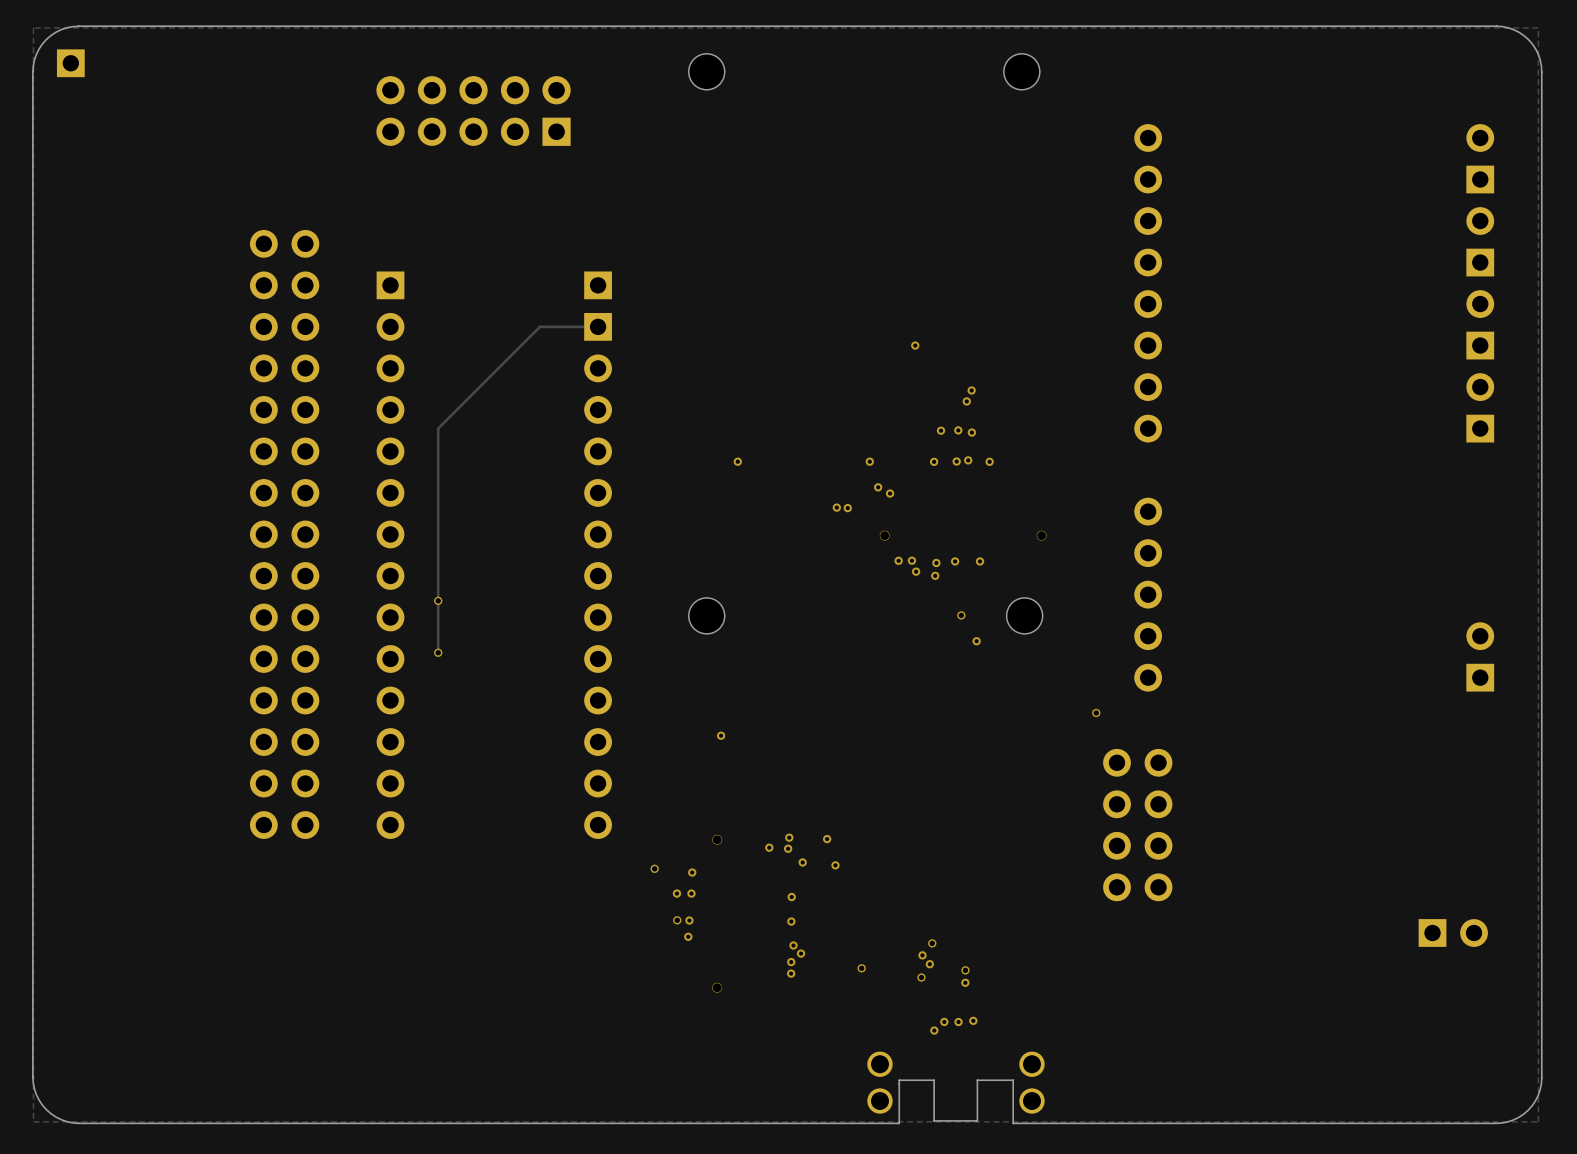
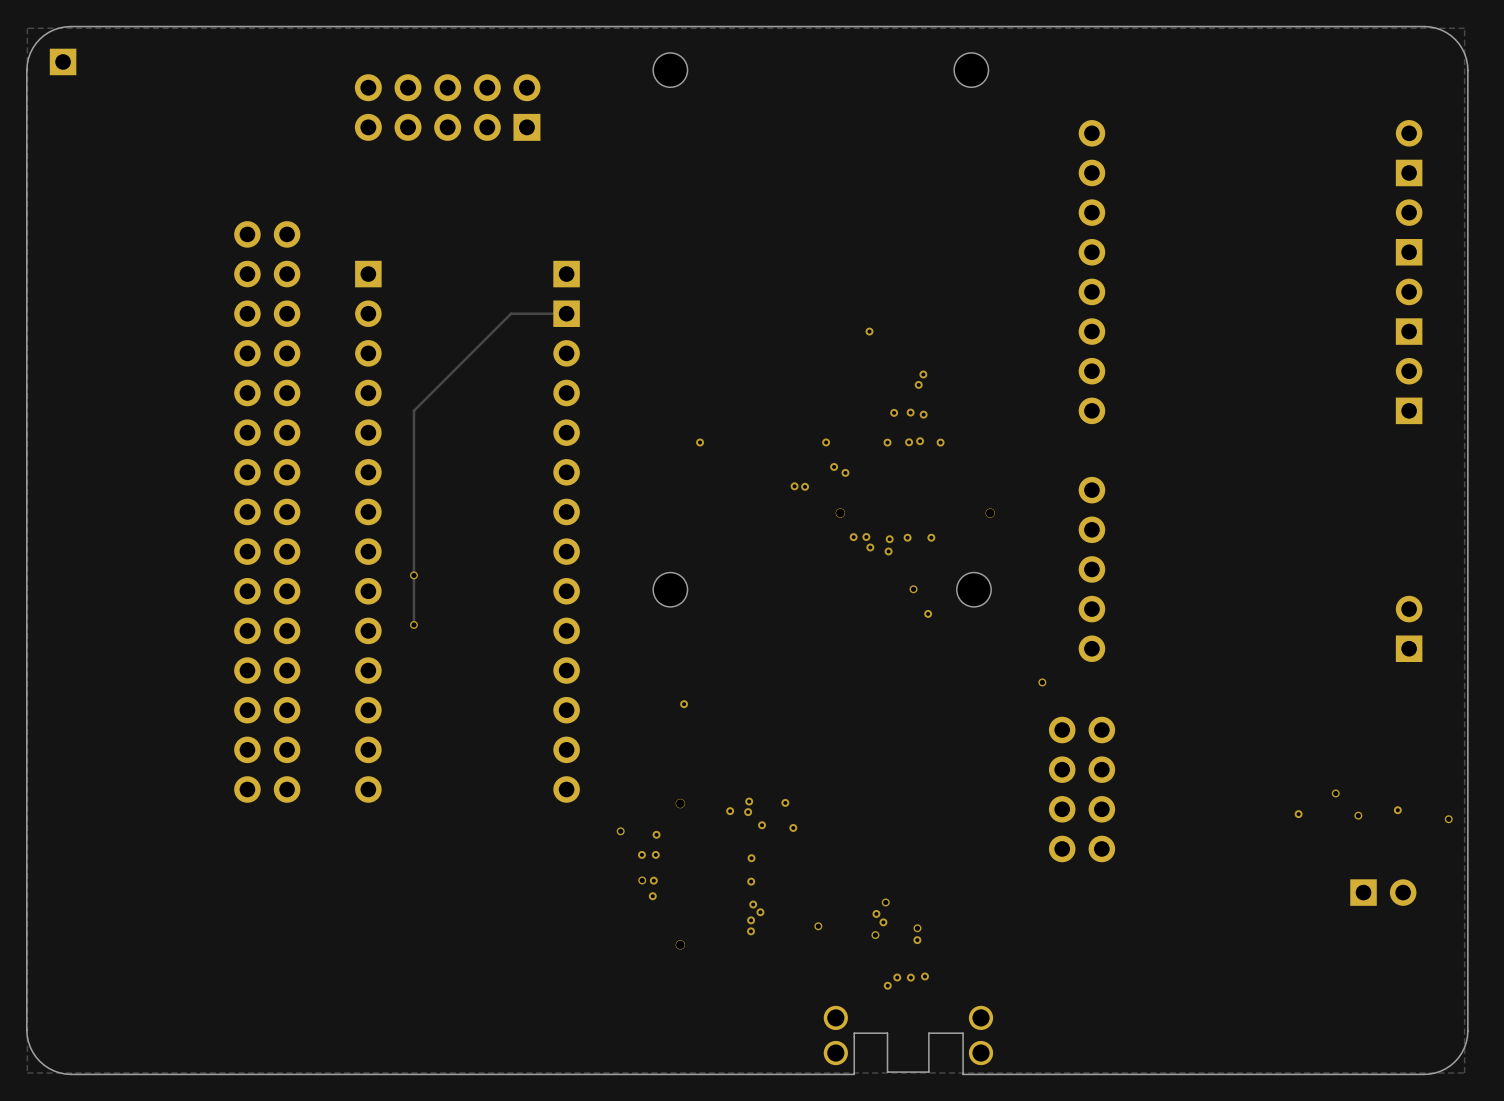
via: none -> (1335, 793)
via: none -> (1397, 810)
via: none -> (1298, 814)
via: none -> (1358, 815)
via: none -> (1448, 819)

